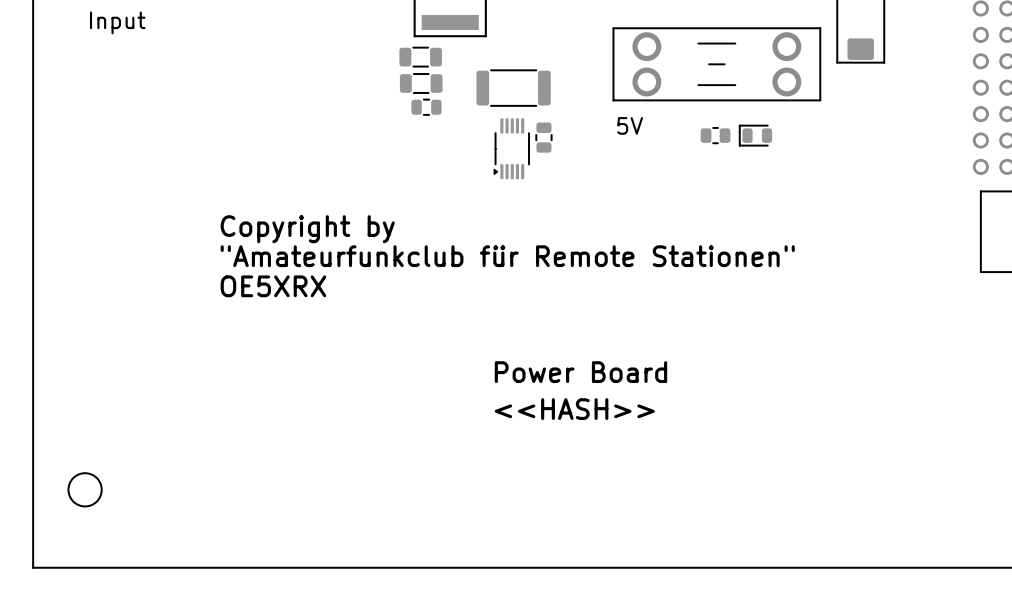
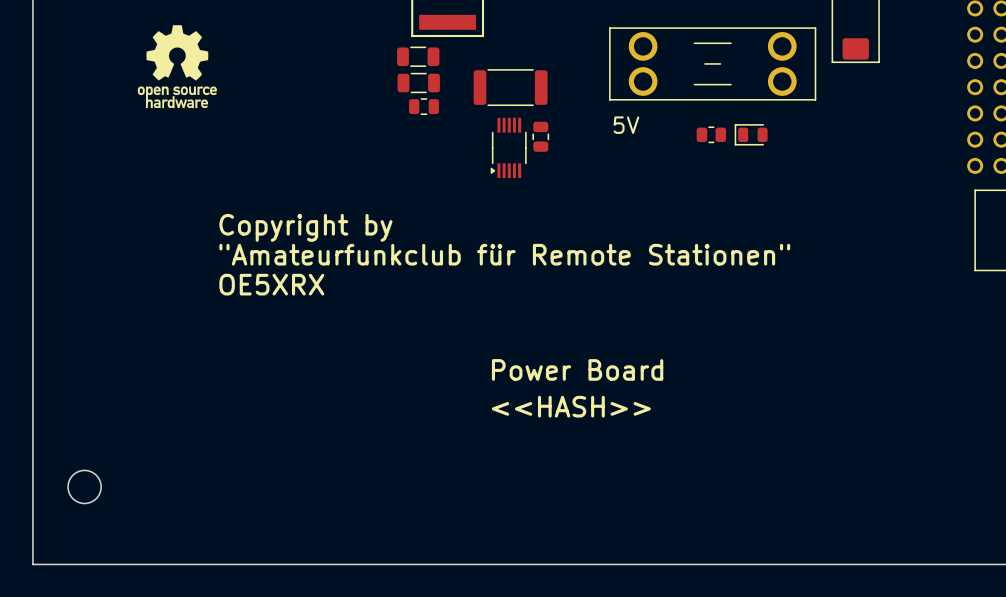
text: Input (117, 22) -> none
drawing: none -> [137, 25, 217, 109]

